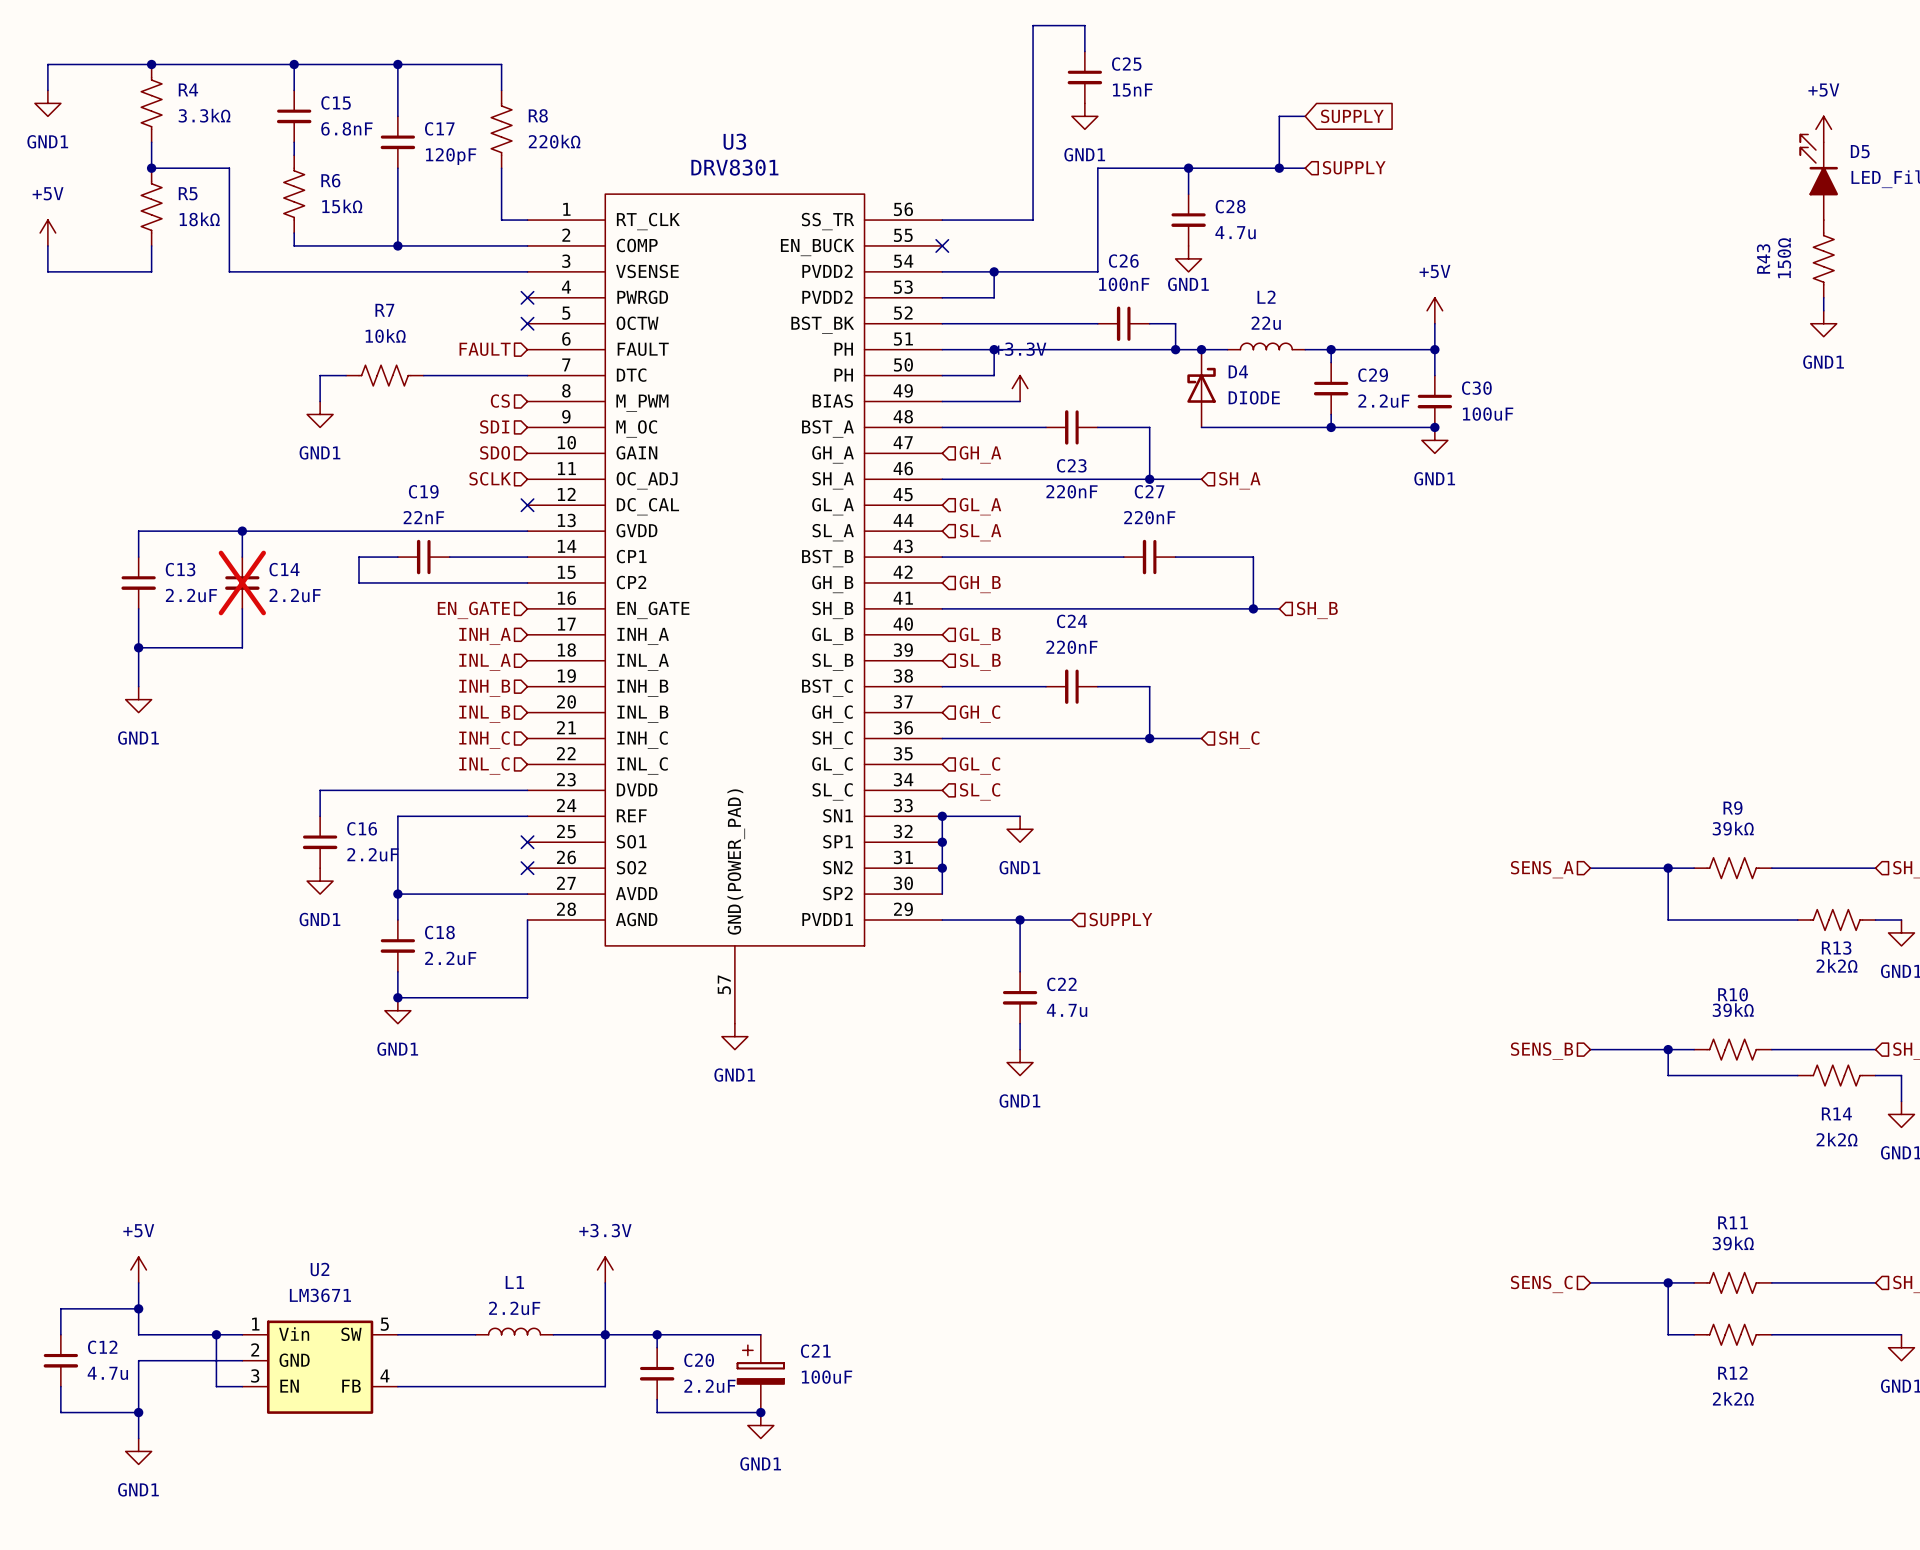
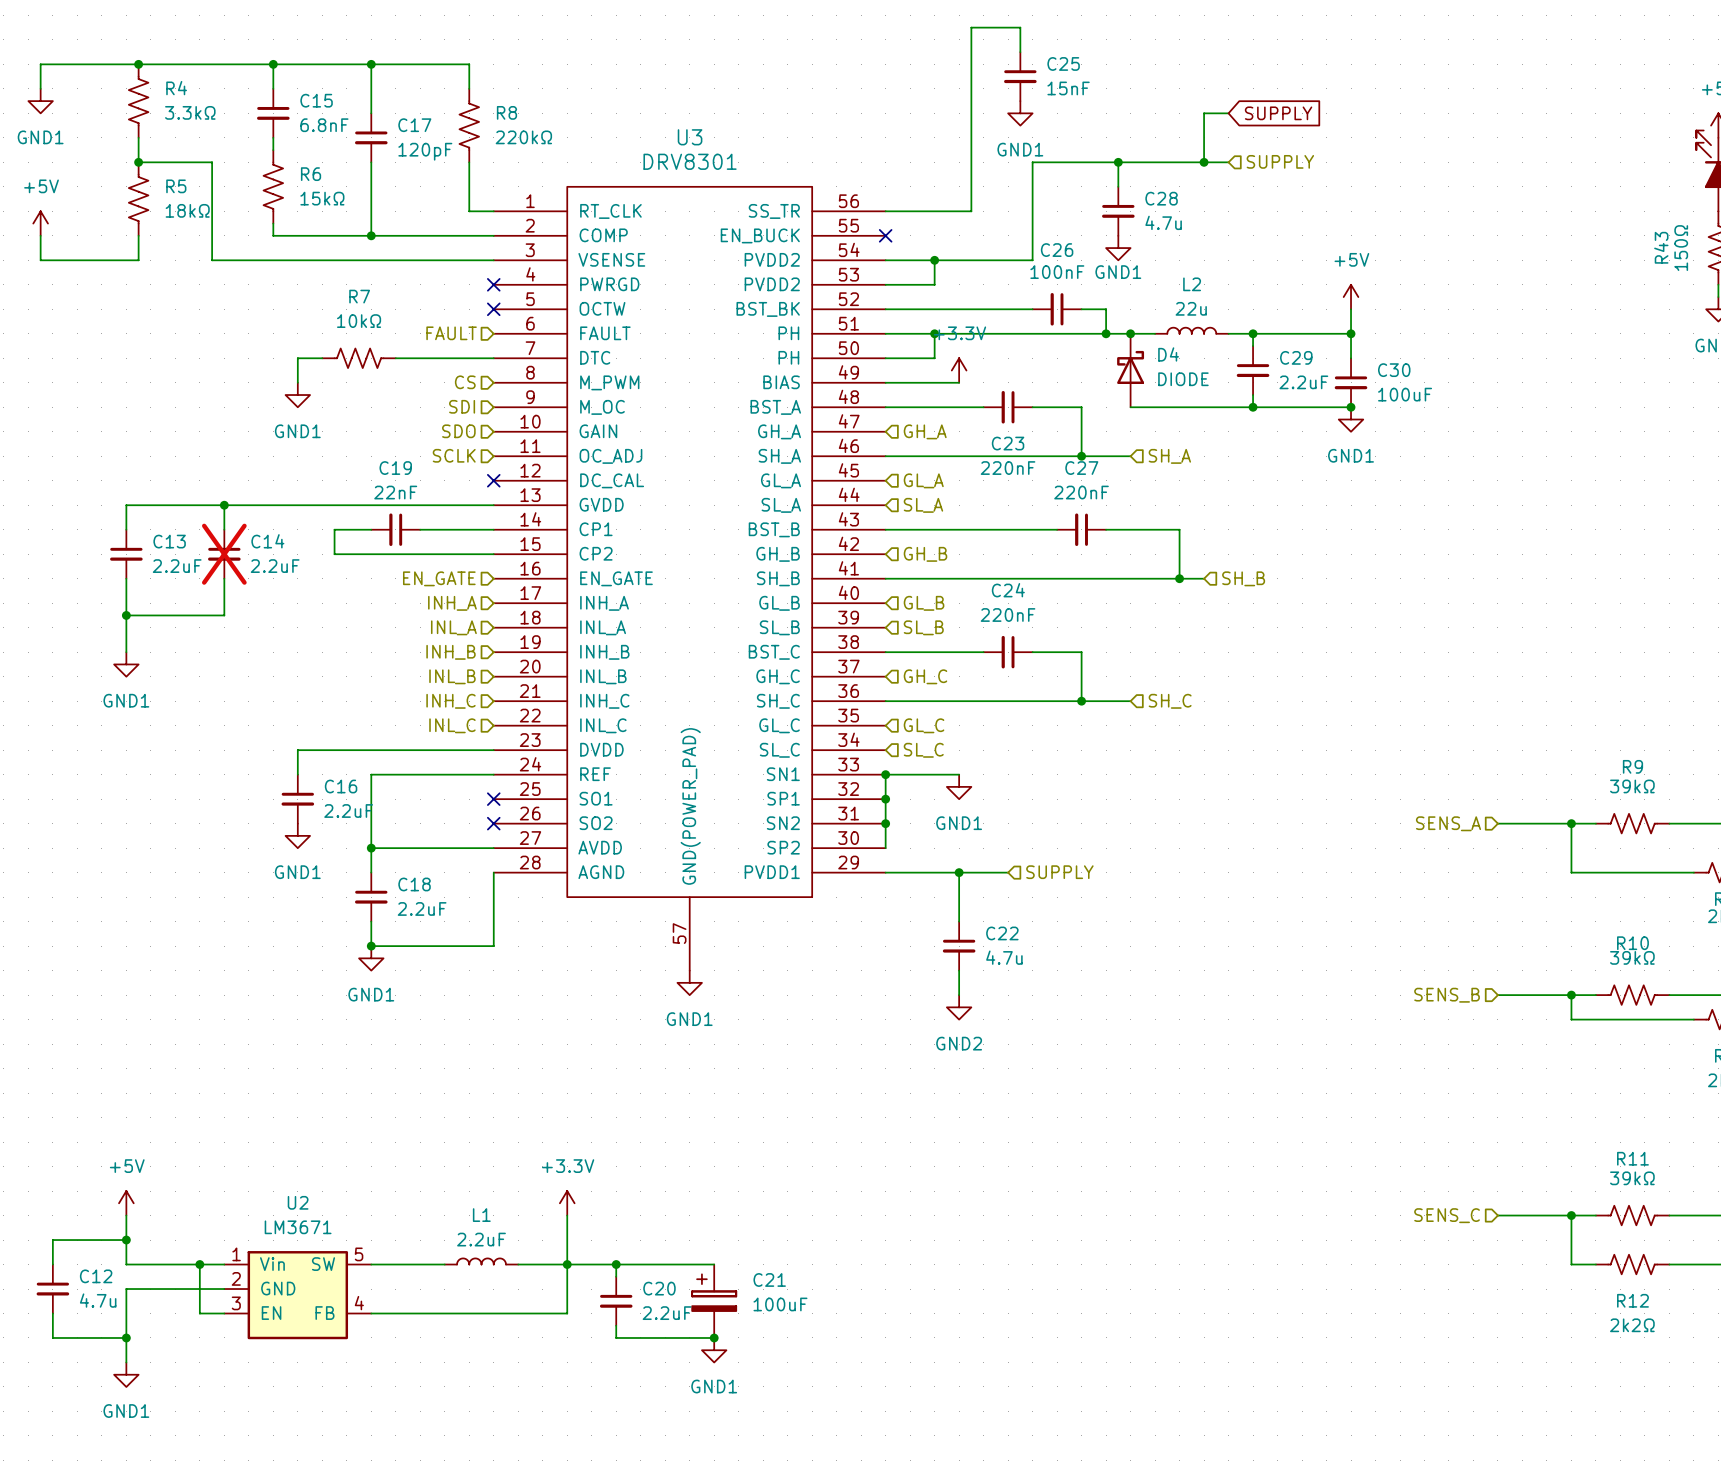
power symbol: GND1 (1020, 1062) -> GND2 (959, 1007)

